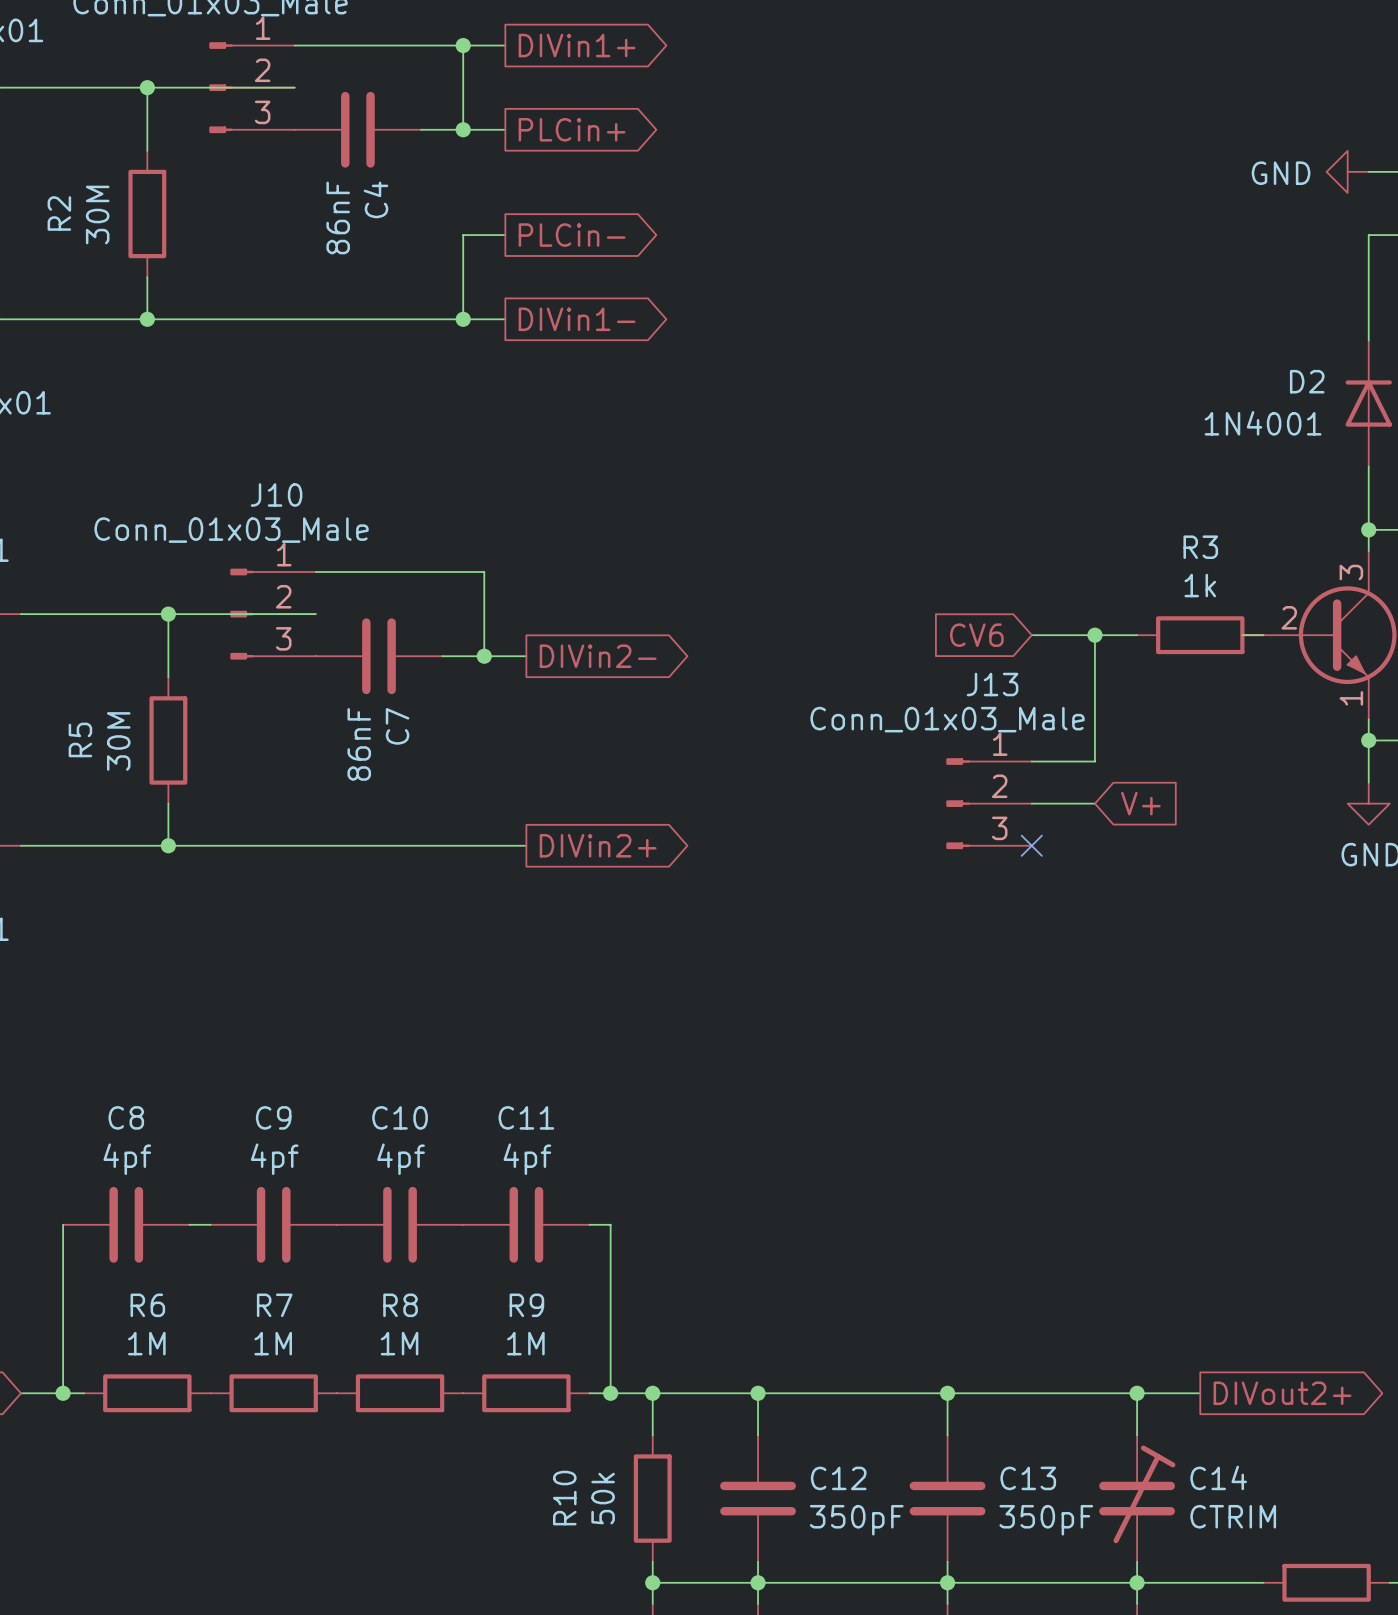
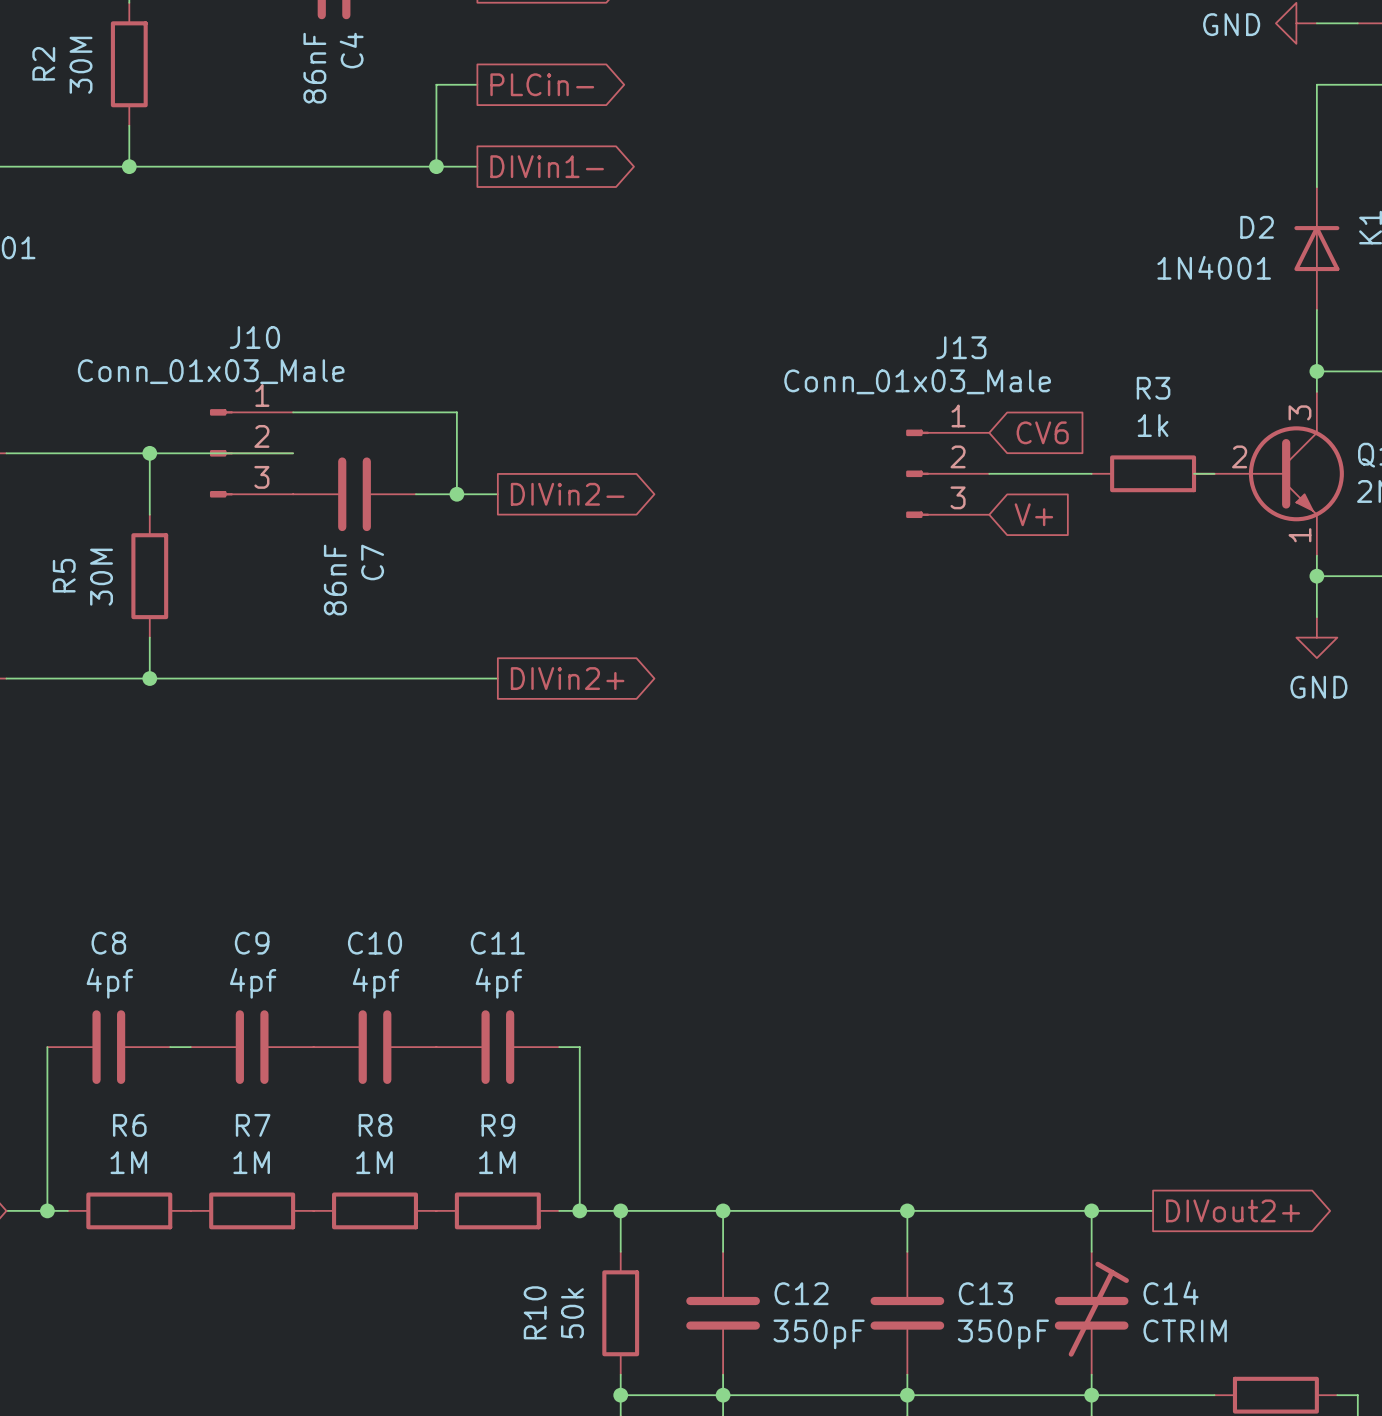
global label rotation: 0° (976, 635) -> 180° (1042, 432)
global label position: CV6 (976, 635) -> CV6 (1042, 432)
wire: (1094, 635) (1094, 761) (1031, 761) -> none
junction: (1094, 635) -> none
J13 name position: J13 (992, 684) -> J13 (961, 347)
J13 value position: Conn_01x03_Male (947, 719) -> Conn_01x03_Male (917, 381)
J13 position: (989, 803) -> (947, 473)
wire: (1031, 803) (1094, 803) -> none
global label position: V+ (1140, 803) -> V+ (1033, 514)
no-connect mark: (1031, 845) -> none

